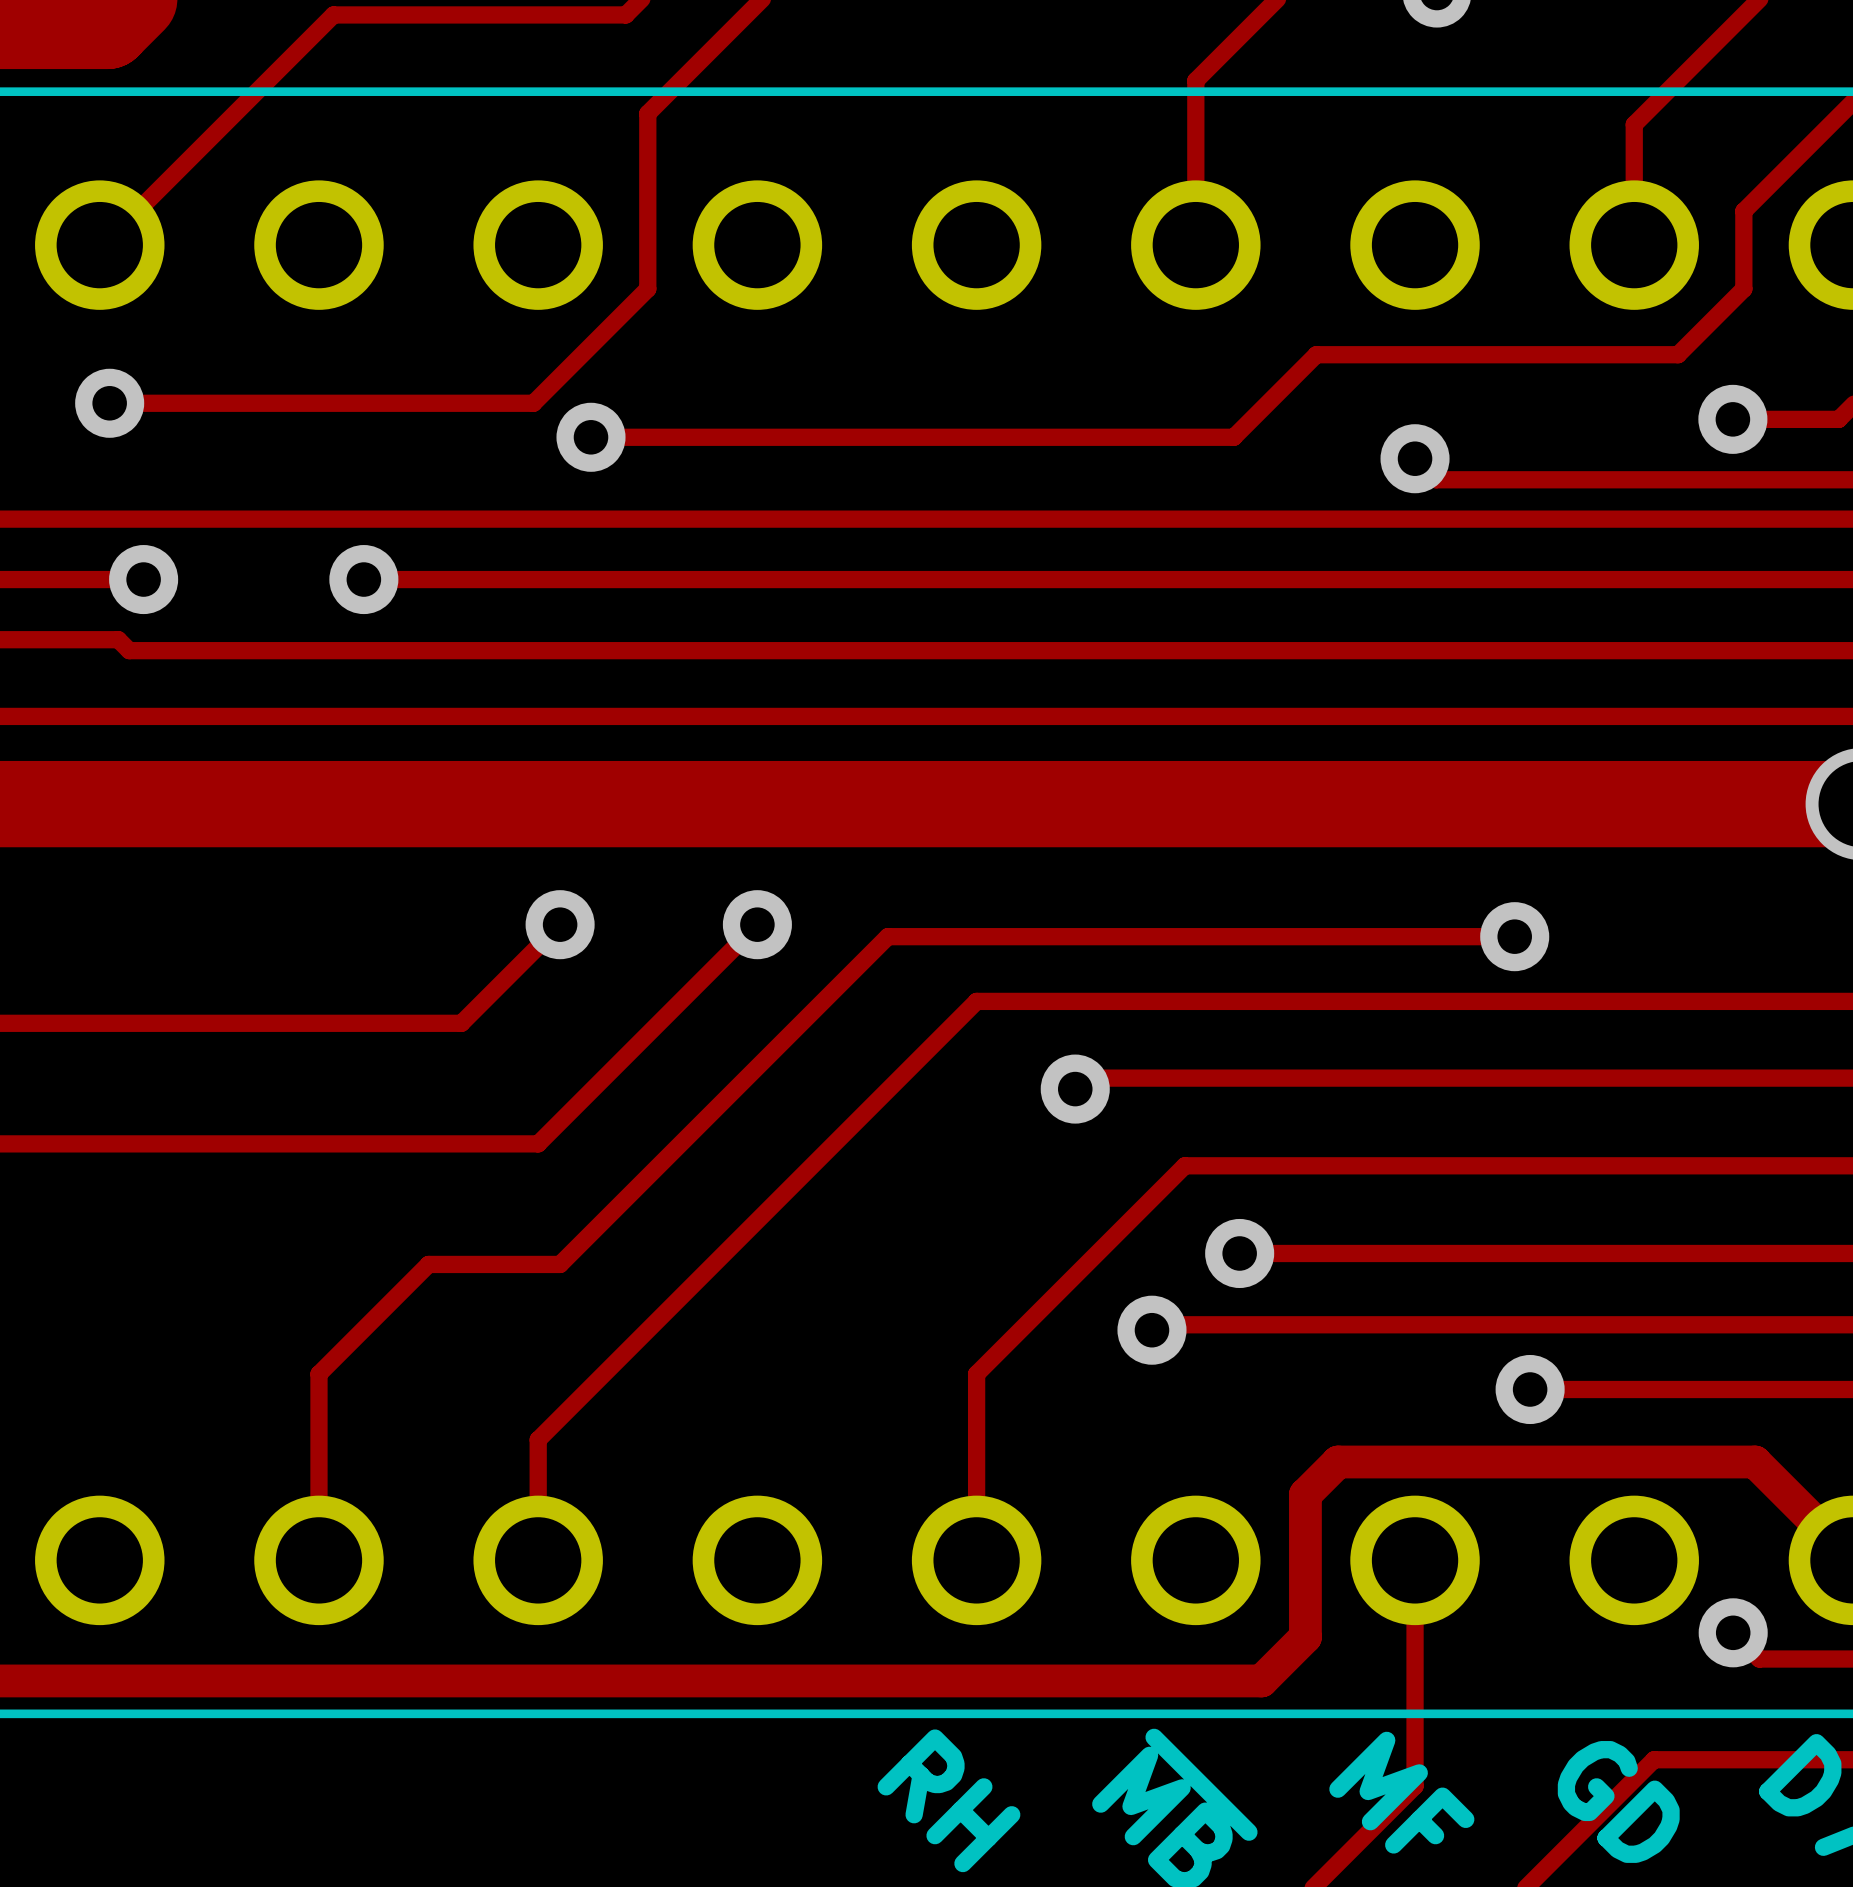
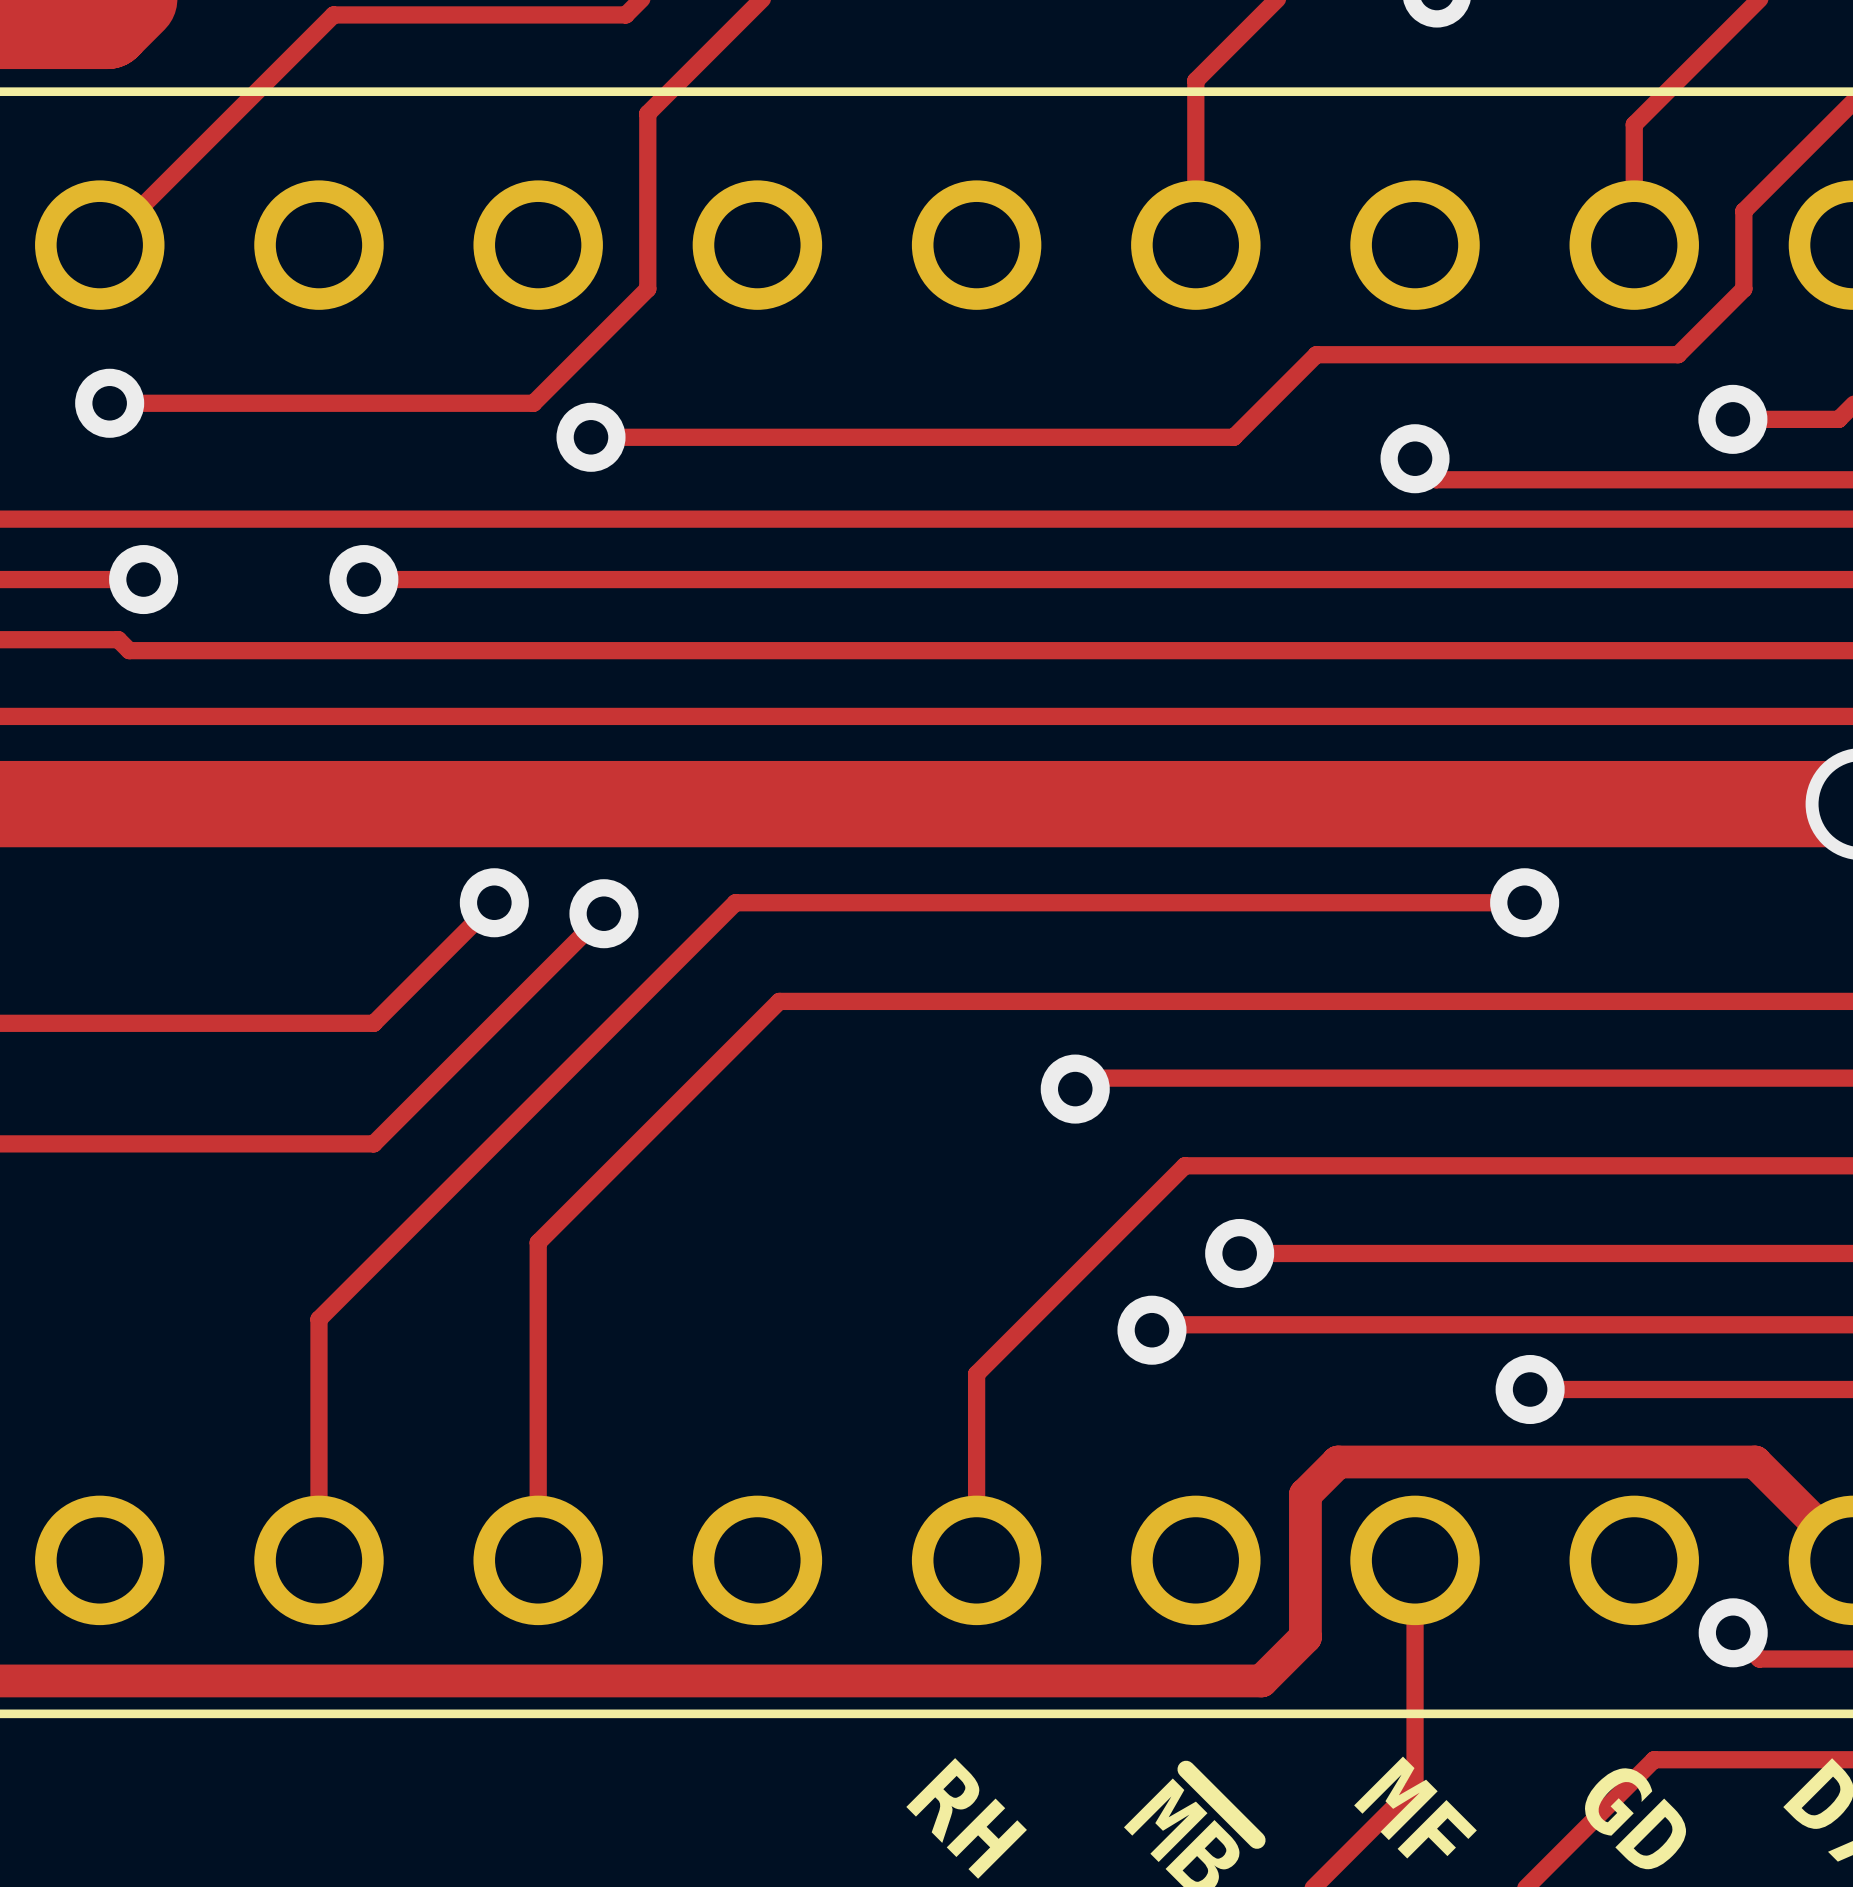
via: none -> (494, 902)
via: none -> (603, 913)
track: (560, 924) (461, 1023) (373, 1023) -> (494, 902) (373, 1023)
via: (560, 924) -> none
track: (757, 924) (538, 1143) (373, 1143) -> (603, 913) (373, 1143)
via: (757, 924) -> none
track: (1514, 936) (887, 936) (560, 1264) (428, 1264) (318, 1374) -> (1524, 902) (735, 902) (318, 1319) (318, 1374)
via position: (1514, 936) -> (1524, 902)
track: (976, 1001) (538, 1439) -> (976, 1001) (779, 1001) (538, 1242) (538, 1439)

